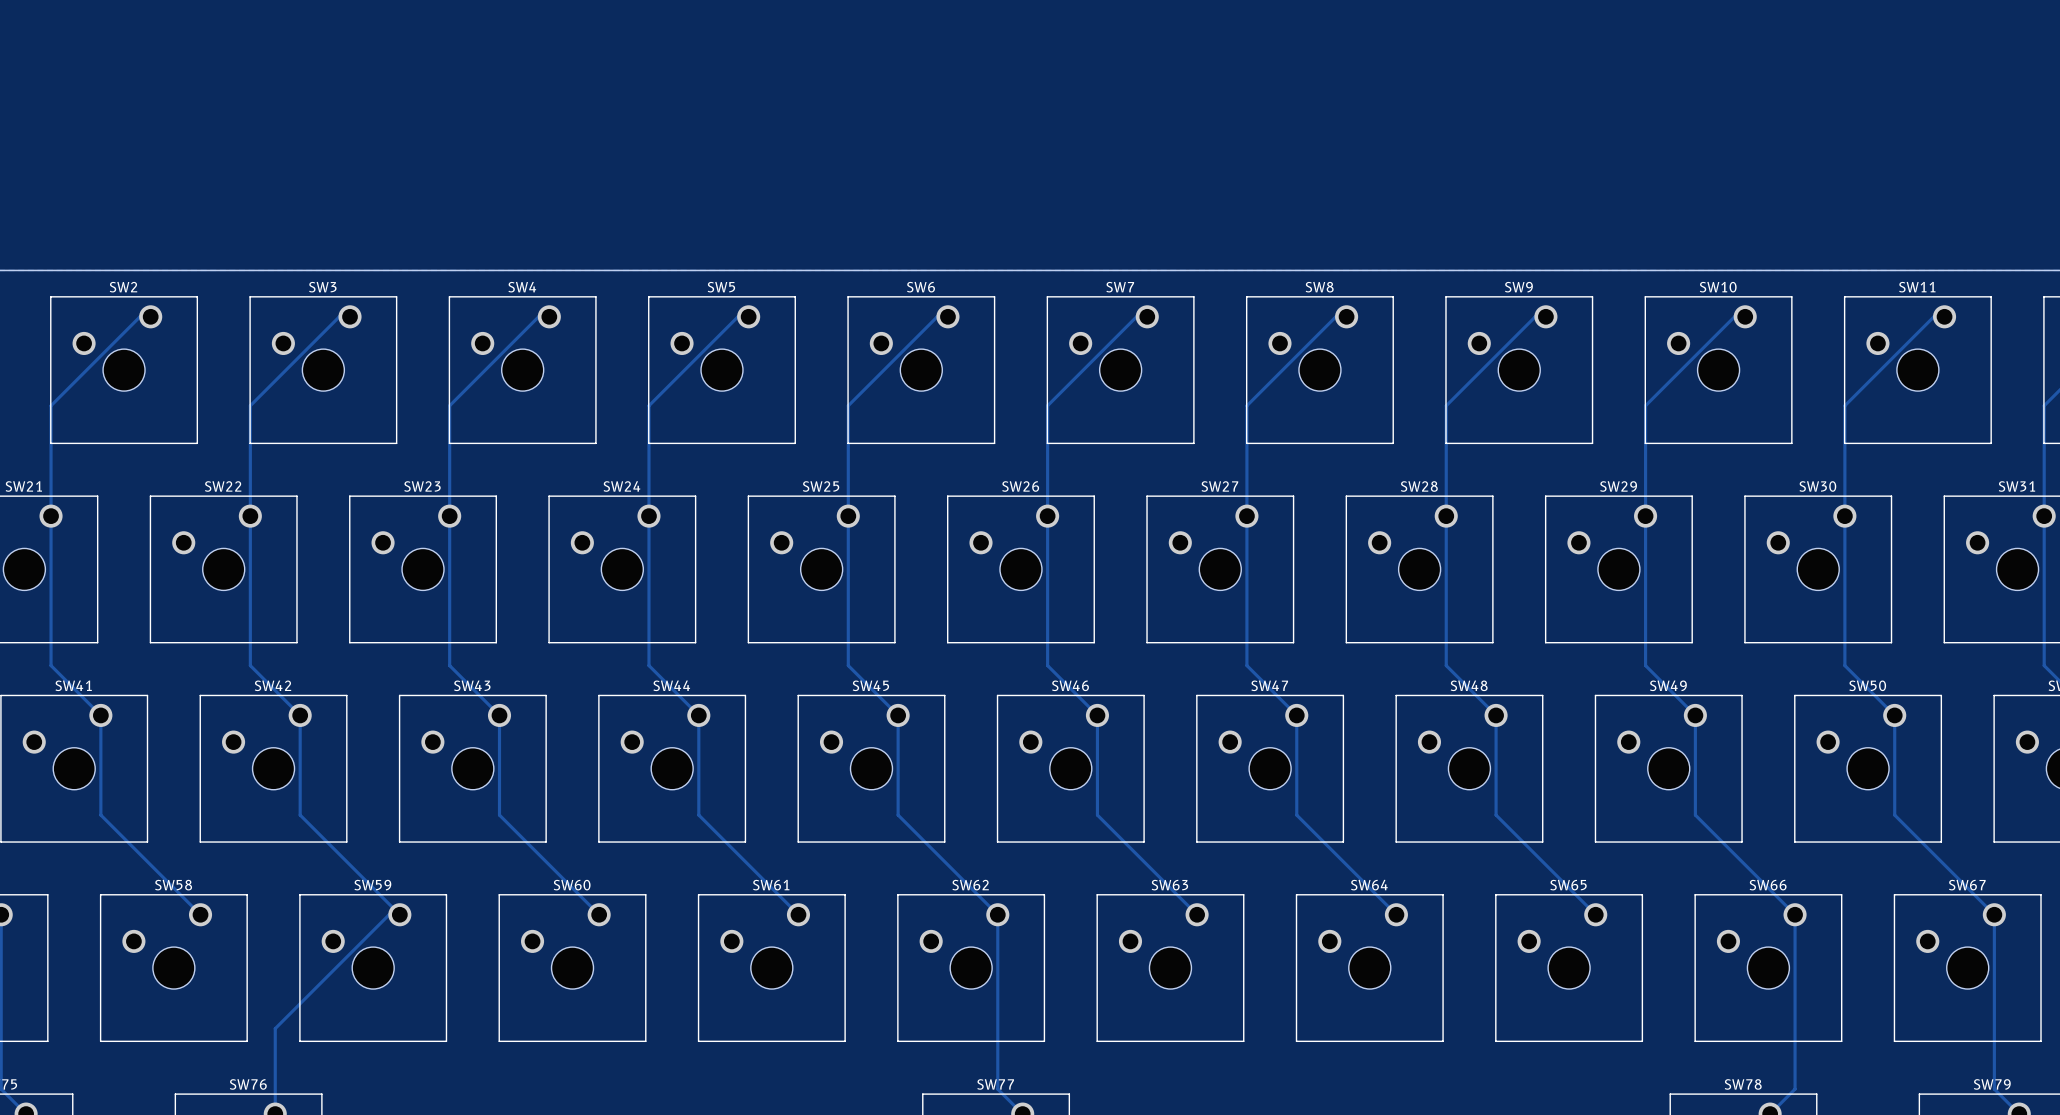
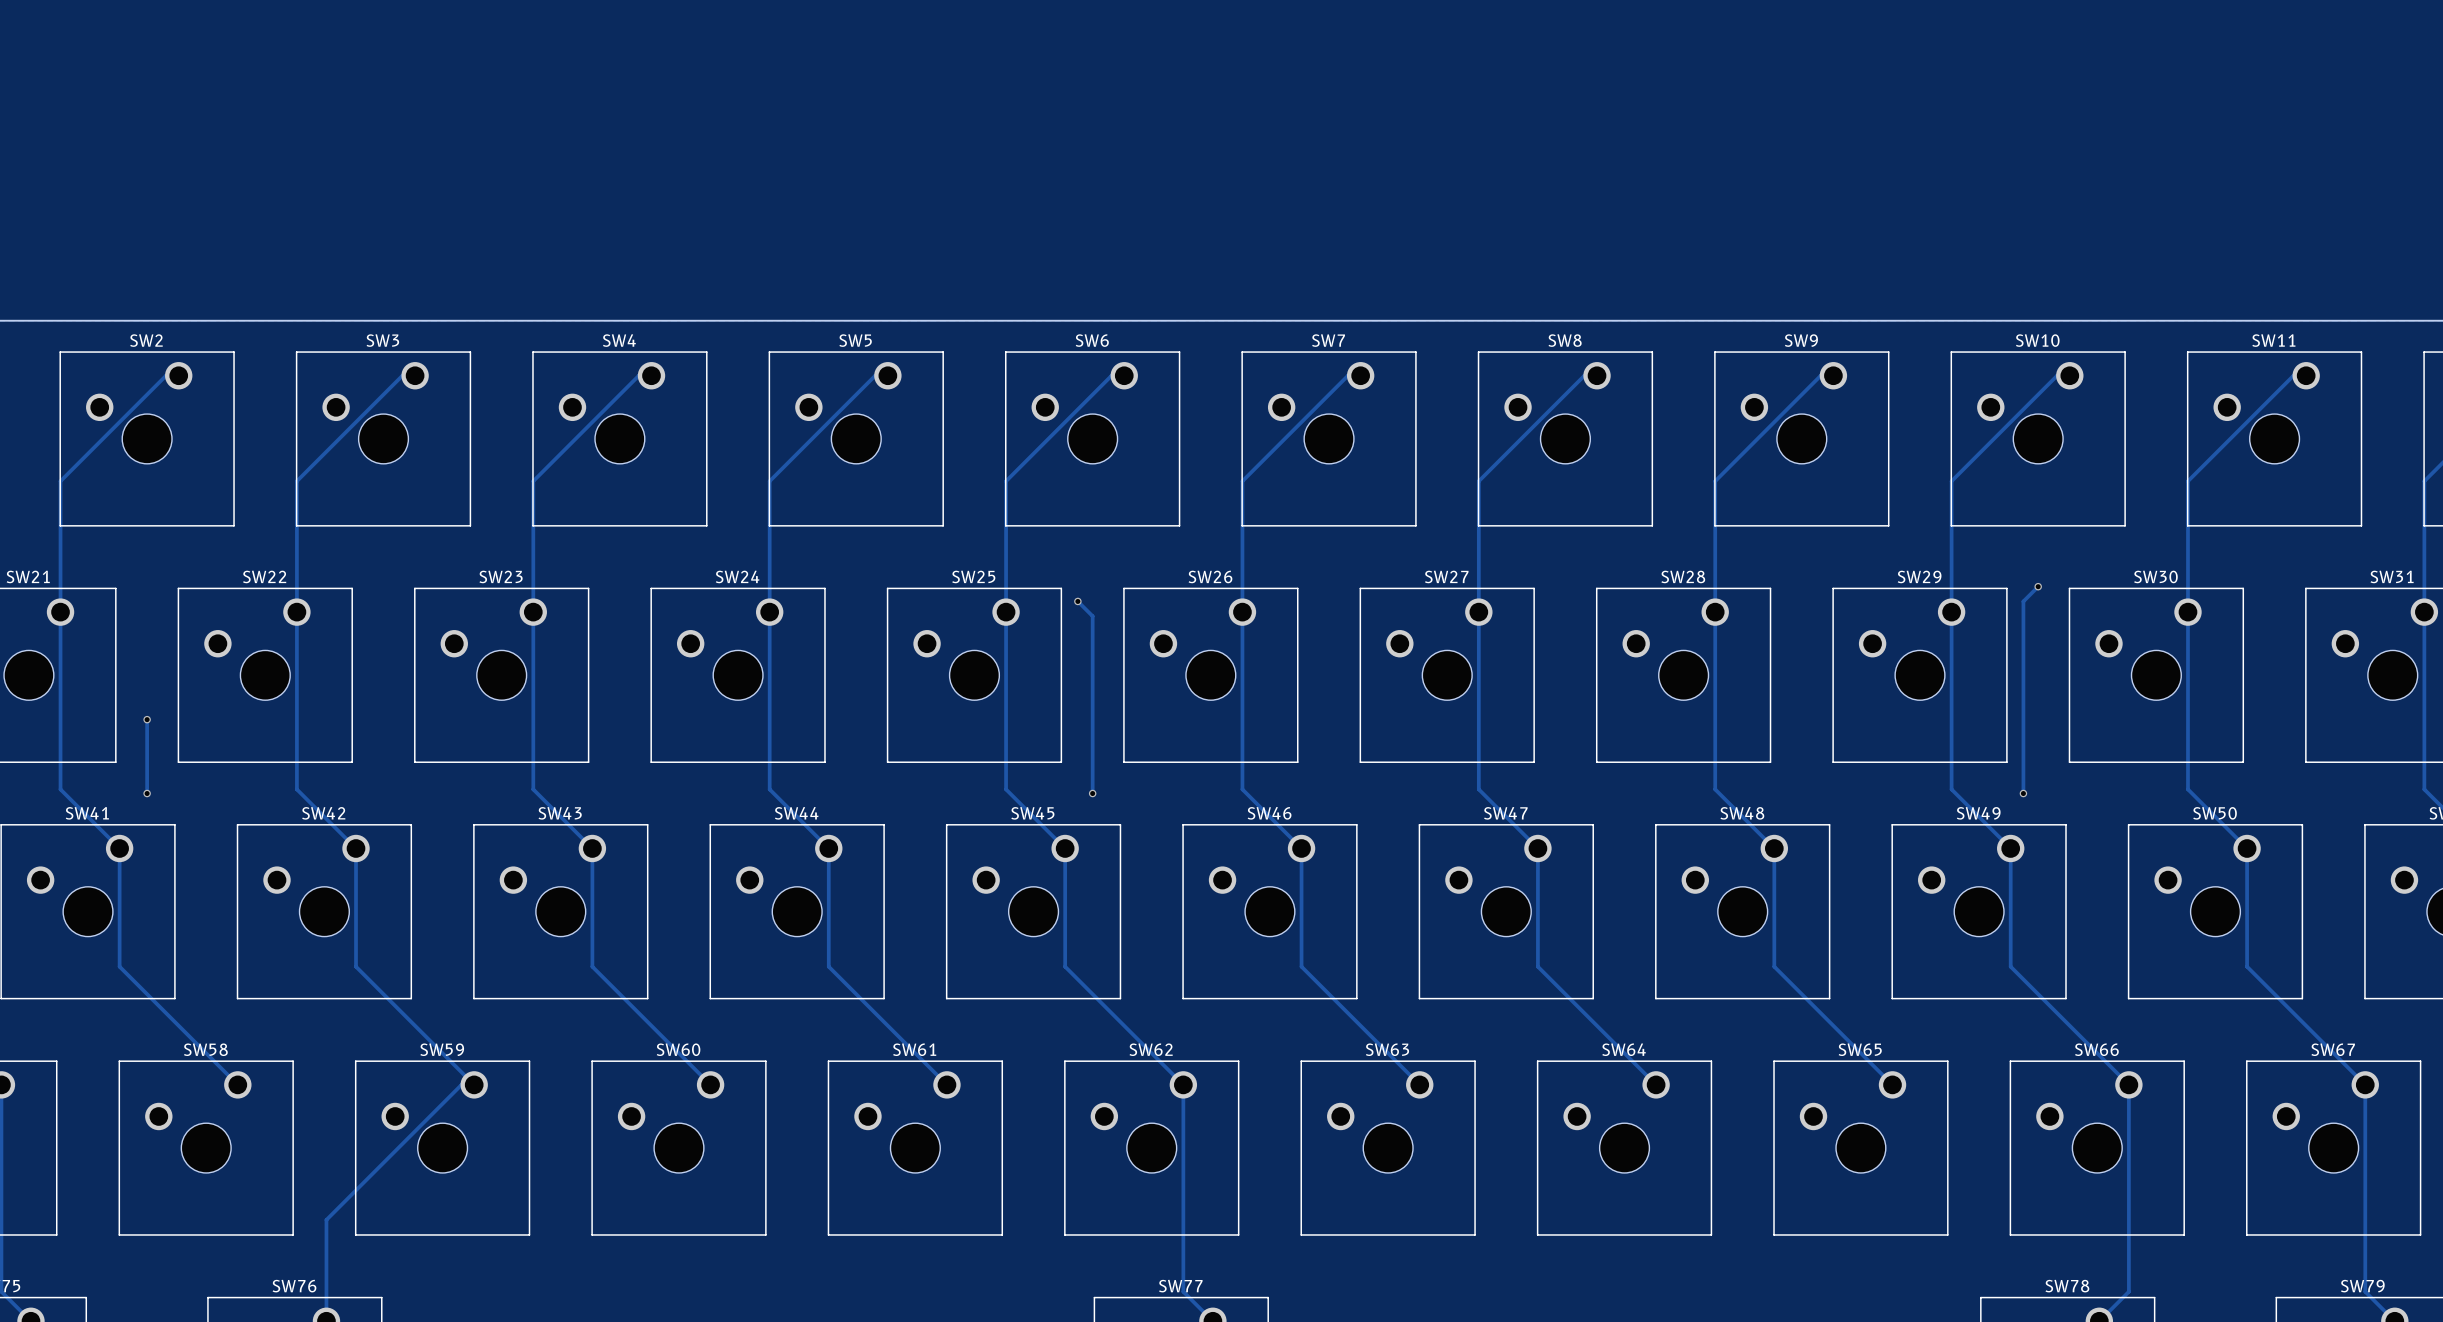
track: none -> (2038, 586) (2023, 601) (2023, 793)
via: none -> (2038, 586)
track: none -> (1077, 601) (1092, 616) (1092, 793)
via: none -> (1077, 601)
track: none -> (147, 719) (147, 793)
via: none -> (147, 719)
via: none -> (147, 793)
via: none -> (1092, 793)
via: none -> (2023, 793)

